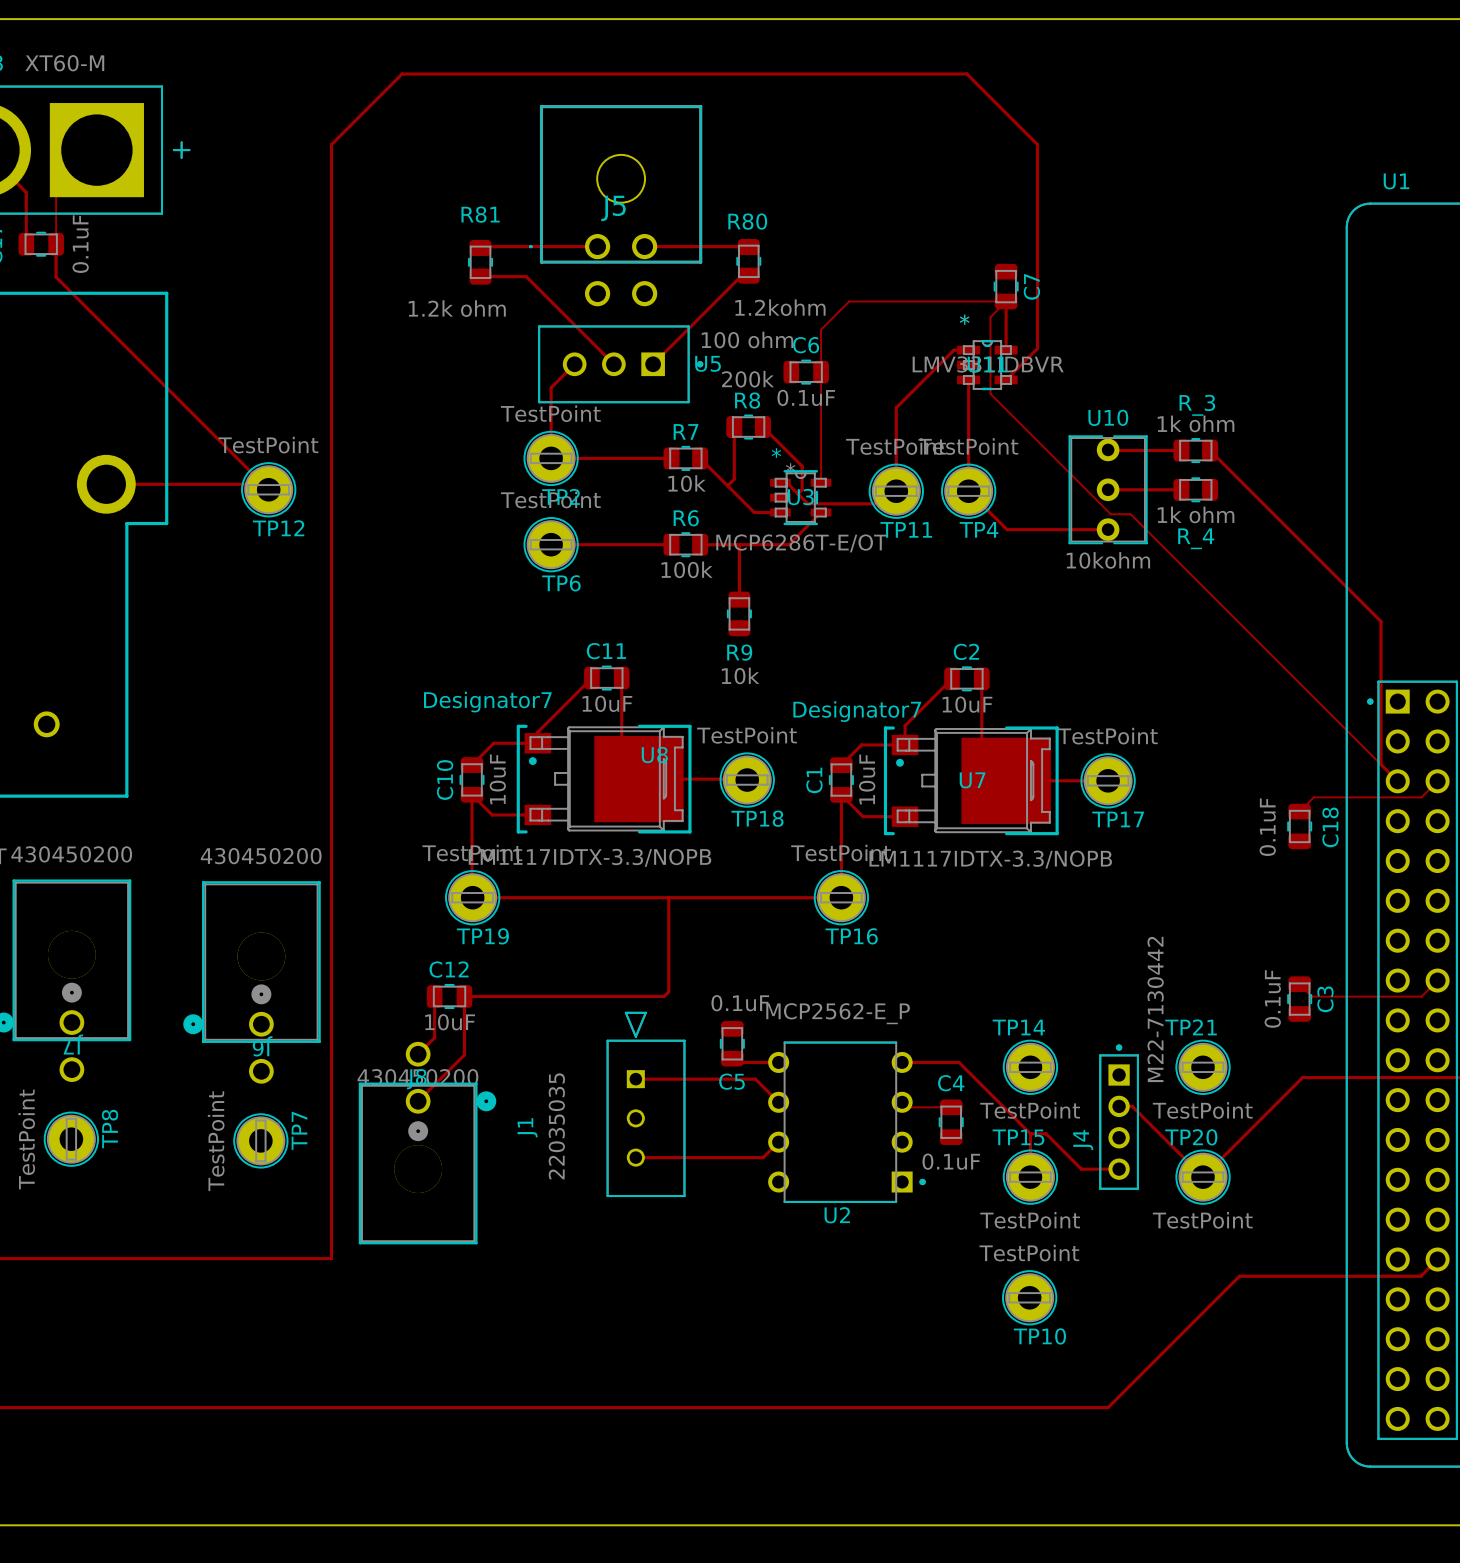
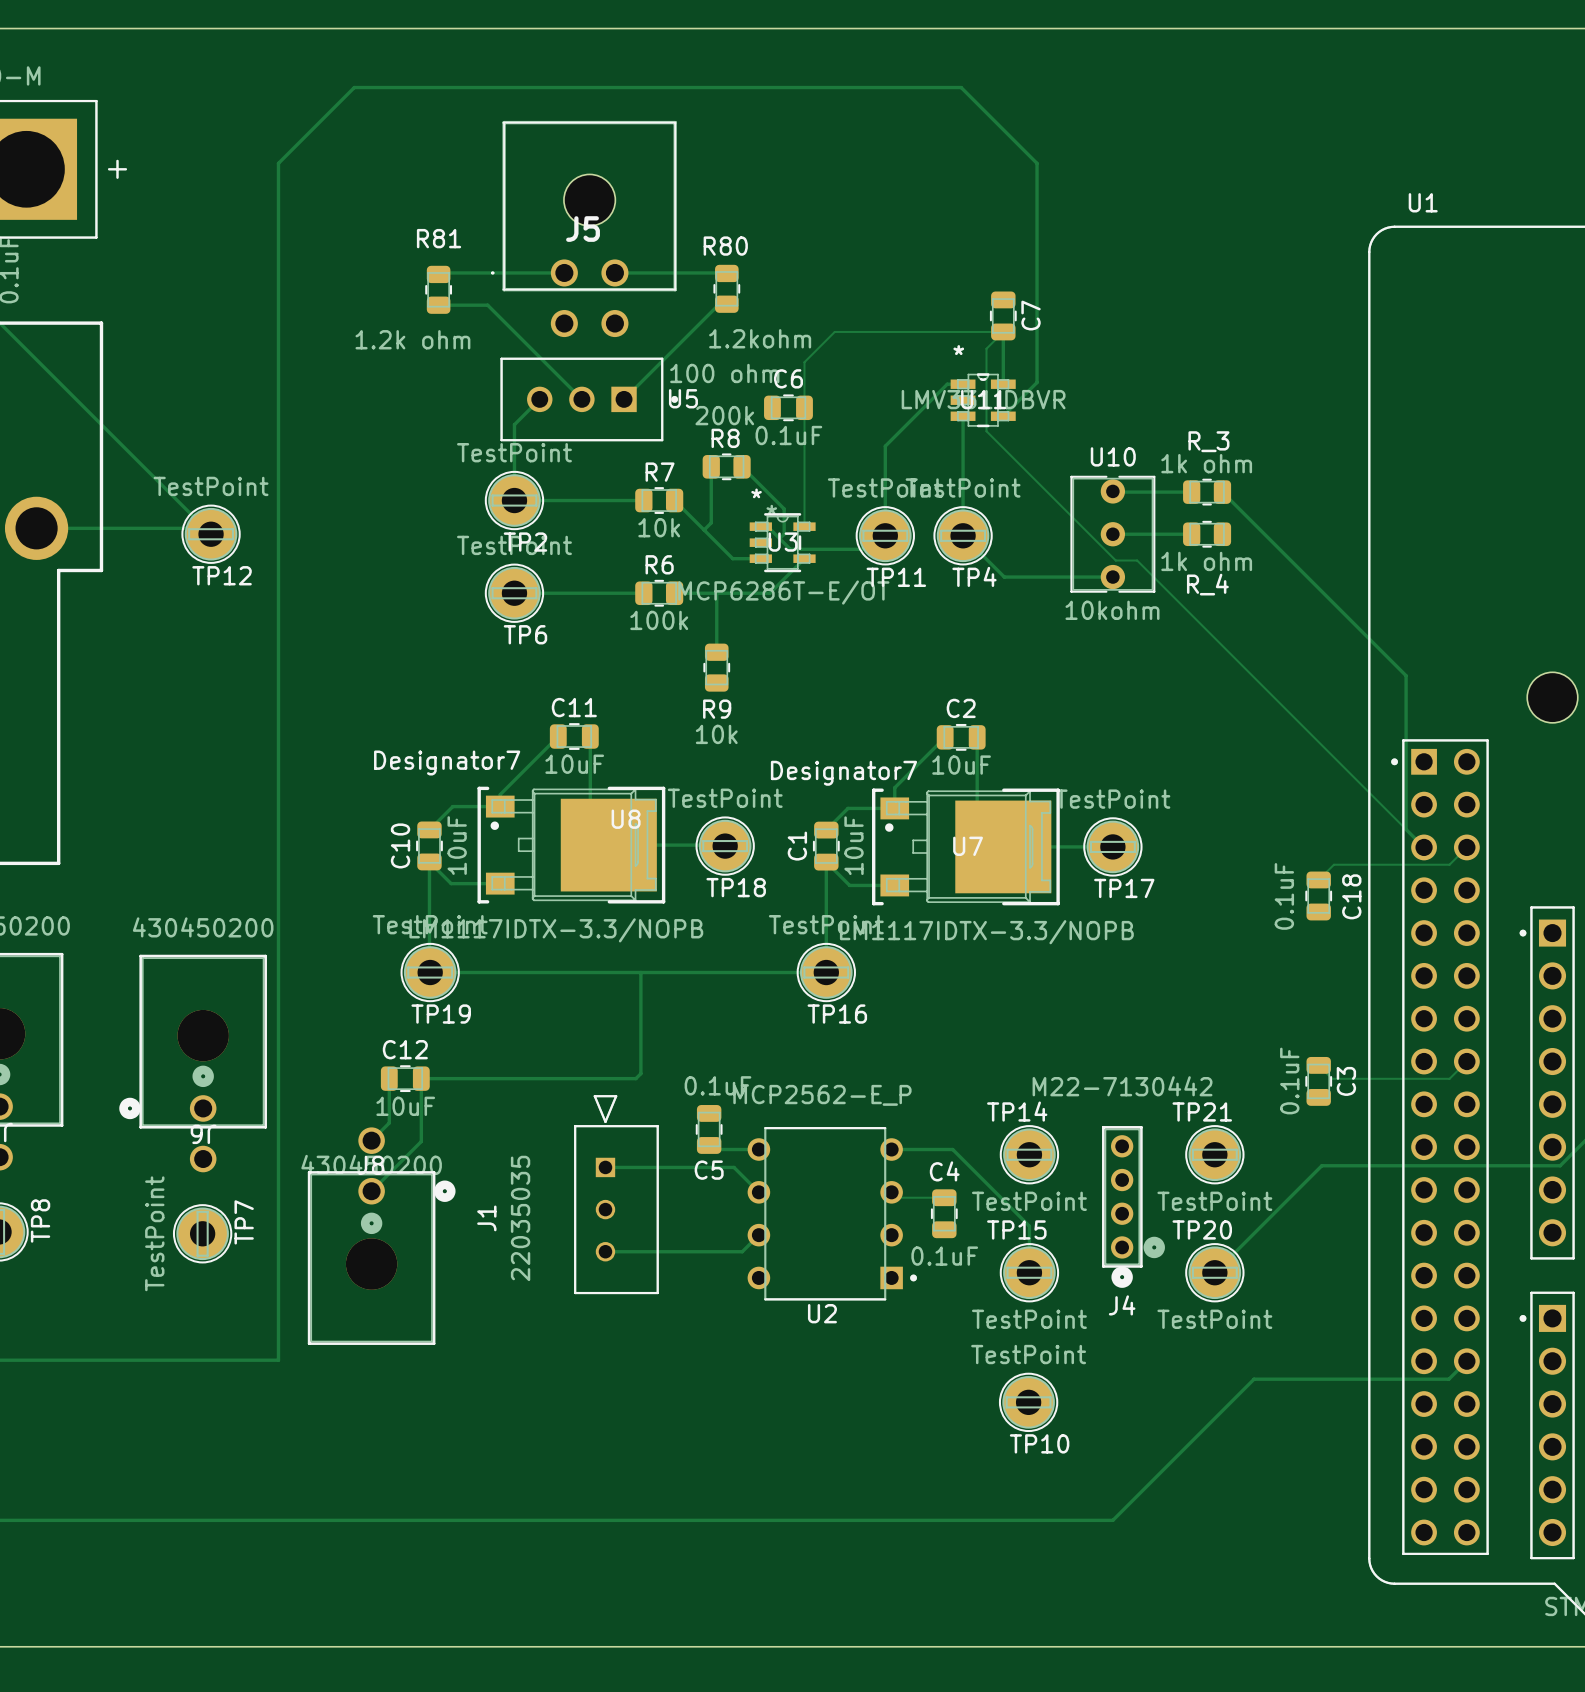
J4 value position: M22-7130442 (1155, 1009) -> M22-7130442 (1122, 1086)
J4 footprint: [1099, 1044, 1139, 1190] -> [1102, 1126, 1165, 1288]
track: (1119, 1106) (1132, 1106) (1203, 1177) -> none
track: (1030, 1133) (1046, 1133) (1081, 1169) (1119, 1169) -> none
J4 name position: J4 (1083, 1140) -> J4 (1122, 1305)

